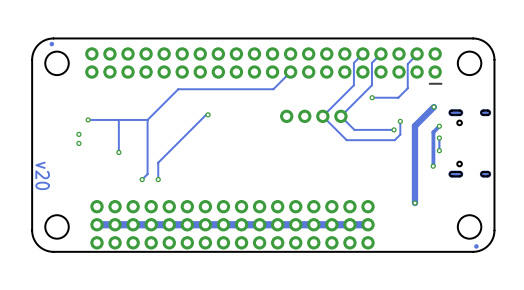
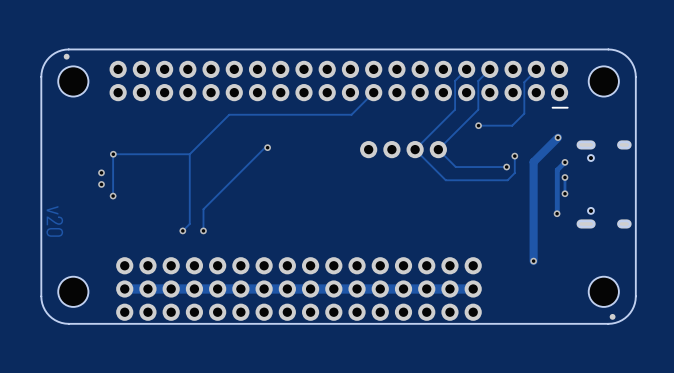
track: none -> (113, 154) (113, 196)
track: (118, 119) (118, 152) -> none
via position: (118, 152) -> (113, 196)

